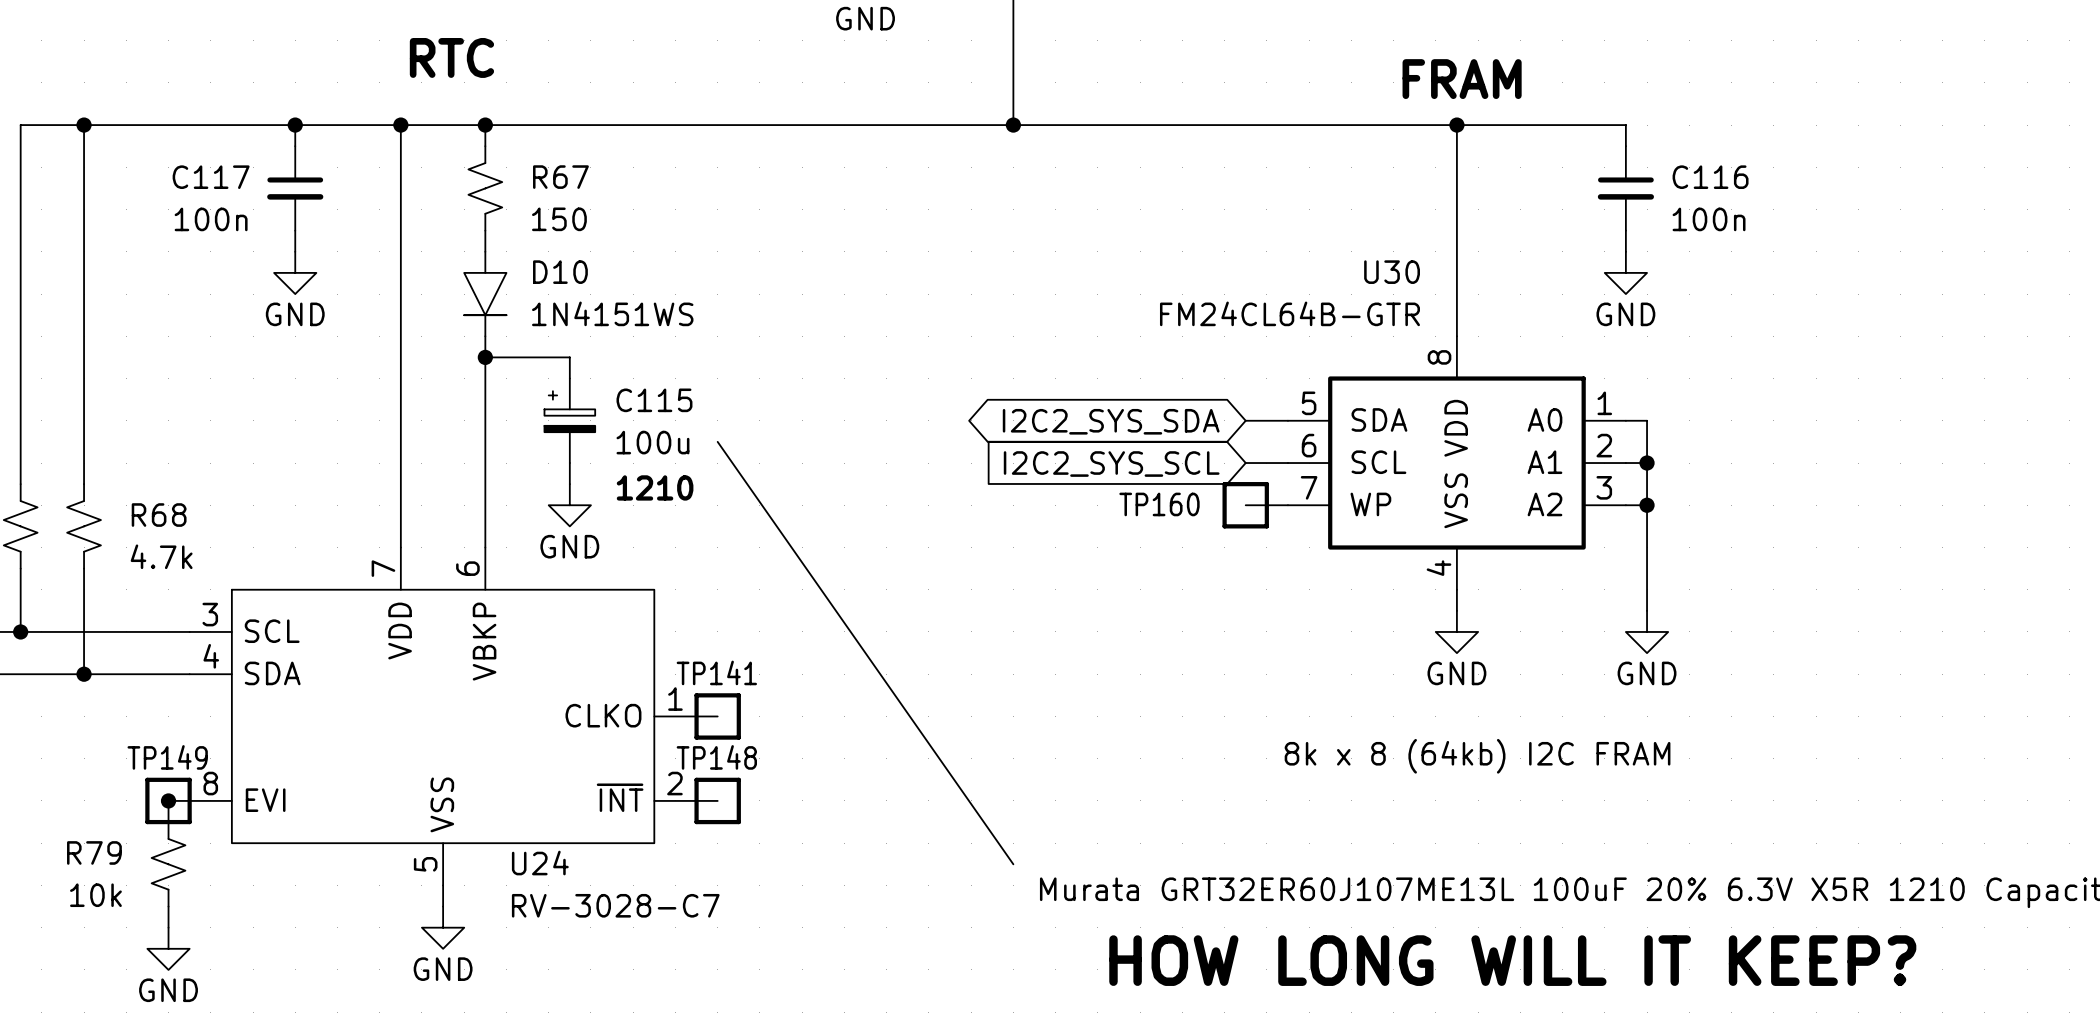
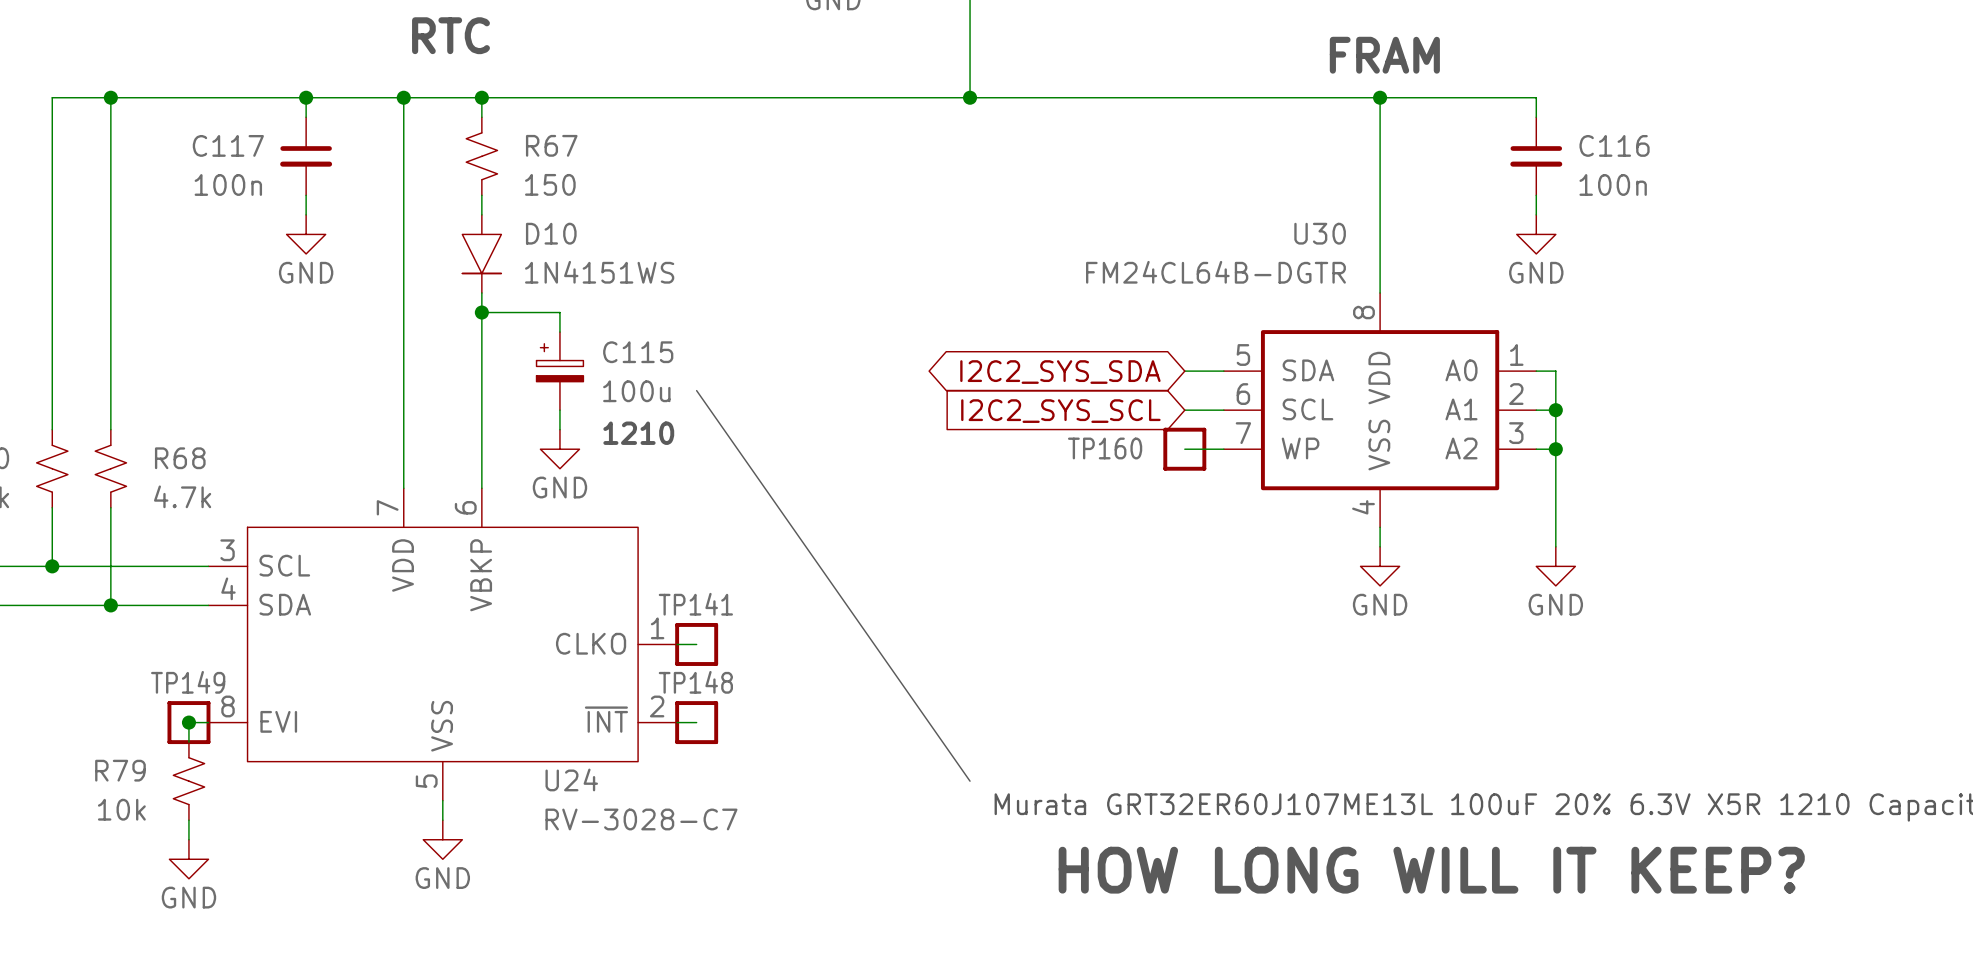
U30 value: FM24CL64B-GTR (1289, 313) -> FM24CL64B-DGTR (1215, 272)
text: 8k x 8 (64kb) I2C FRAM (1477, 756) -> none
U24 name position: U24 (540, 863) -> U24 (571, 779)
U24 value position: RV-3028-C7 (615, 905) -> RV-3028-C7 (641, 819)

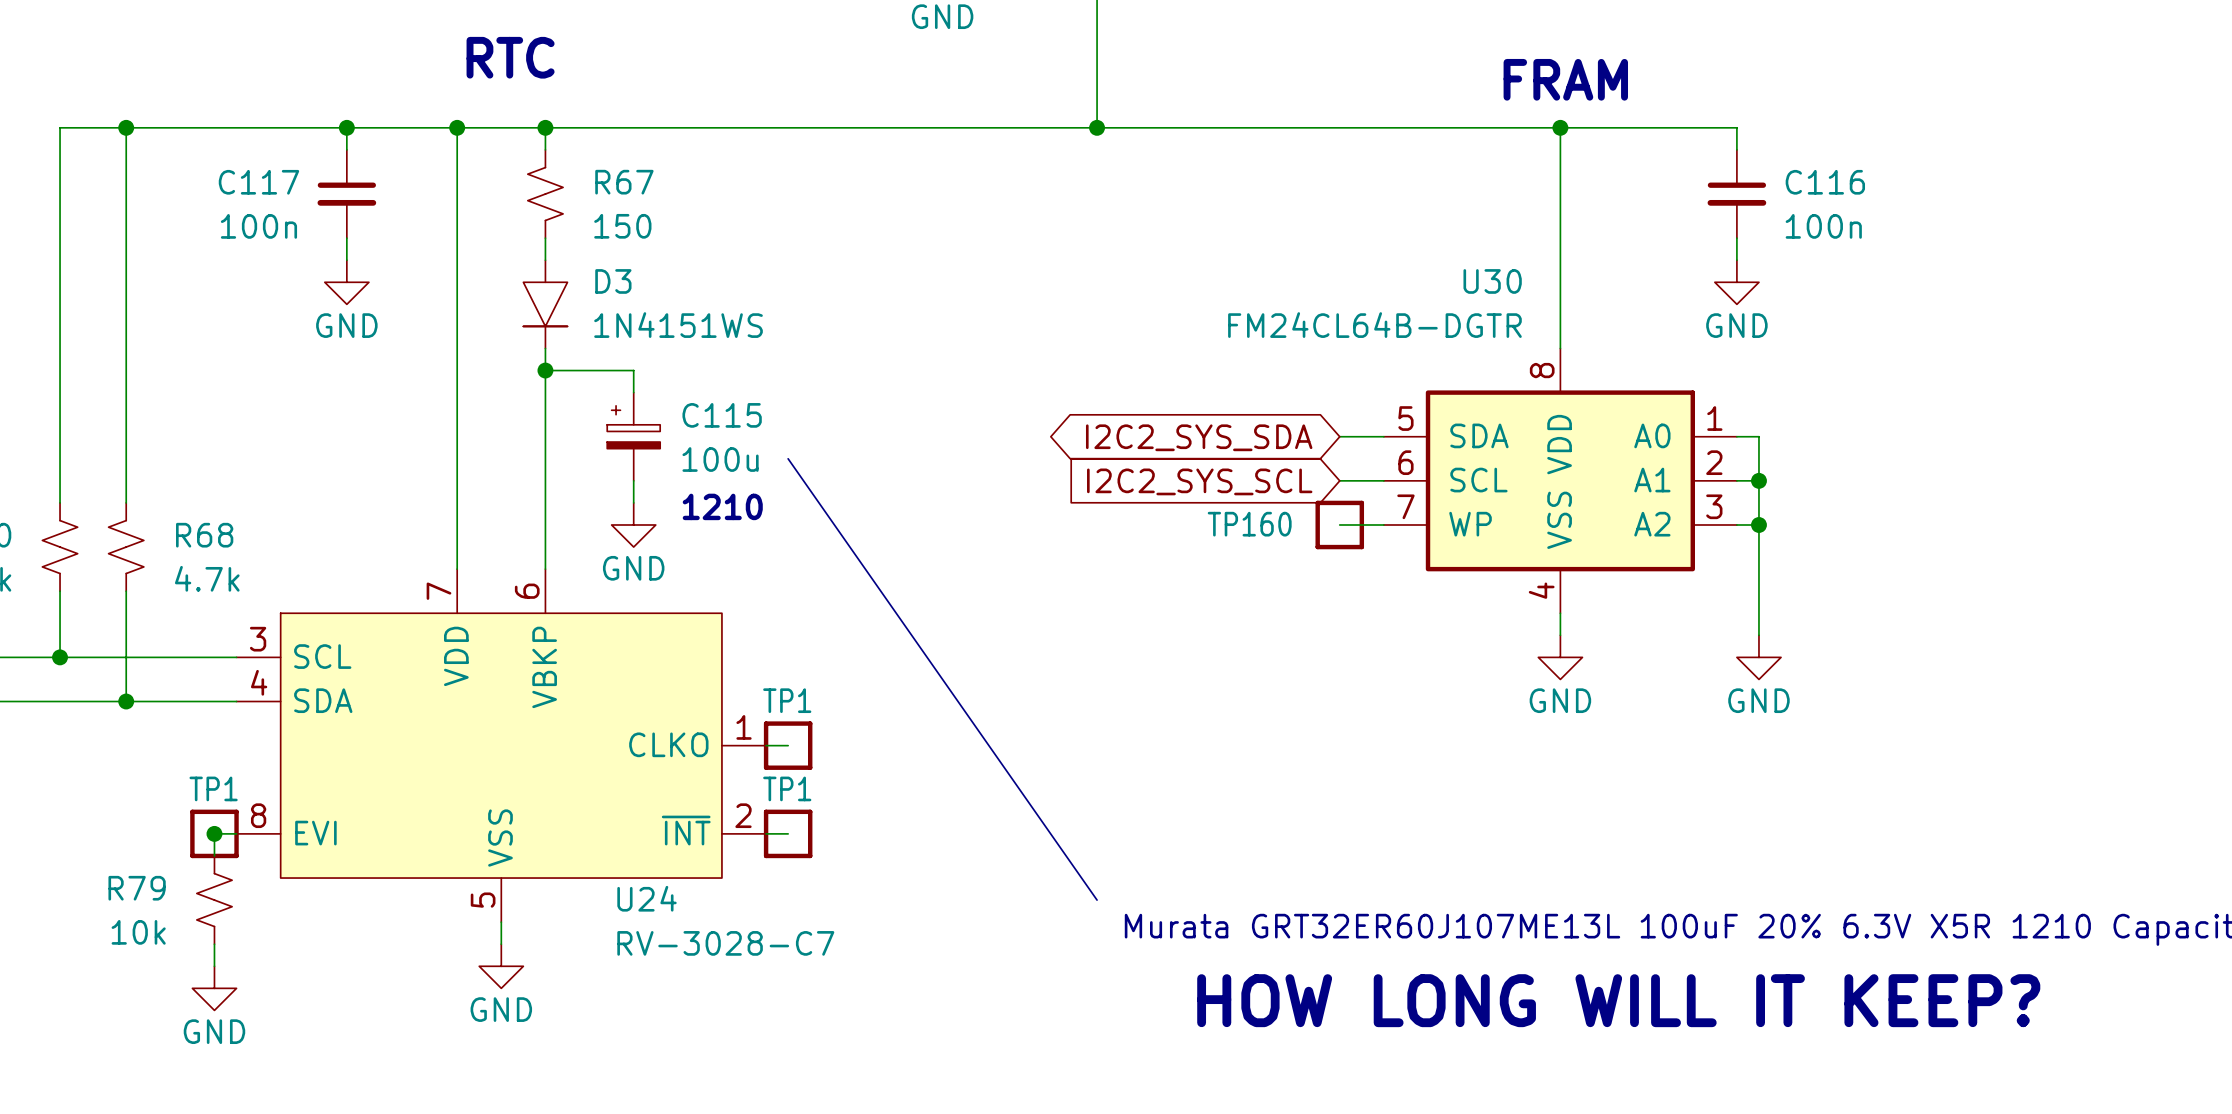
D10 name: D10 (551, 233) -> D3 (613, 281)
TP141 name: TP141 (695, 604) -> TP1 (787, 700)
TP149 name: TP149 (188, 682) -> TP1 (213, 788)
TP148 name: TP148 (695, 682) -> TP1 (787, 788)

